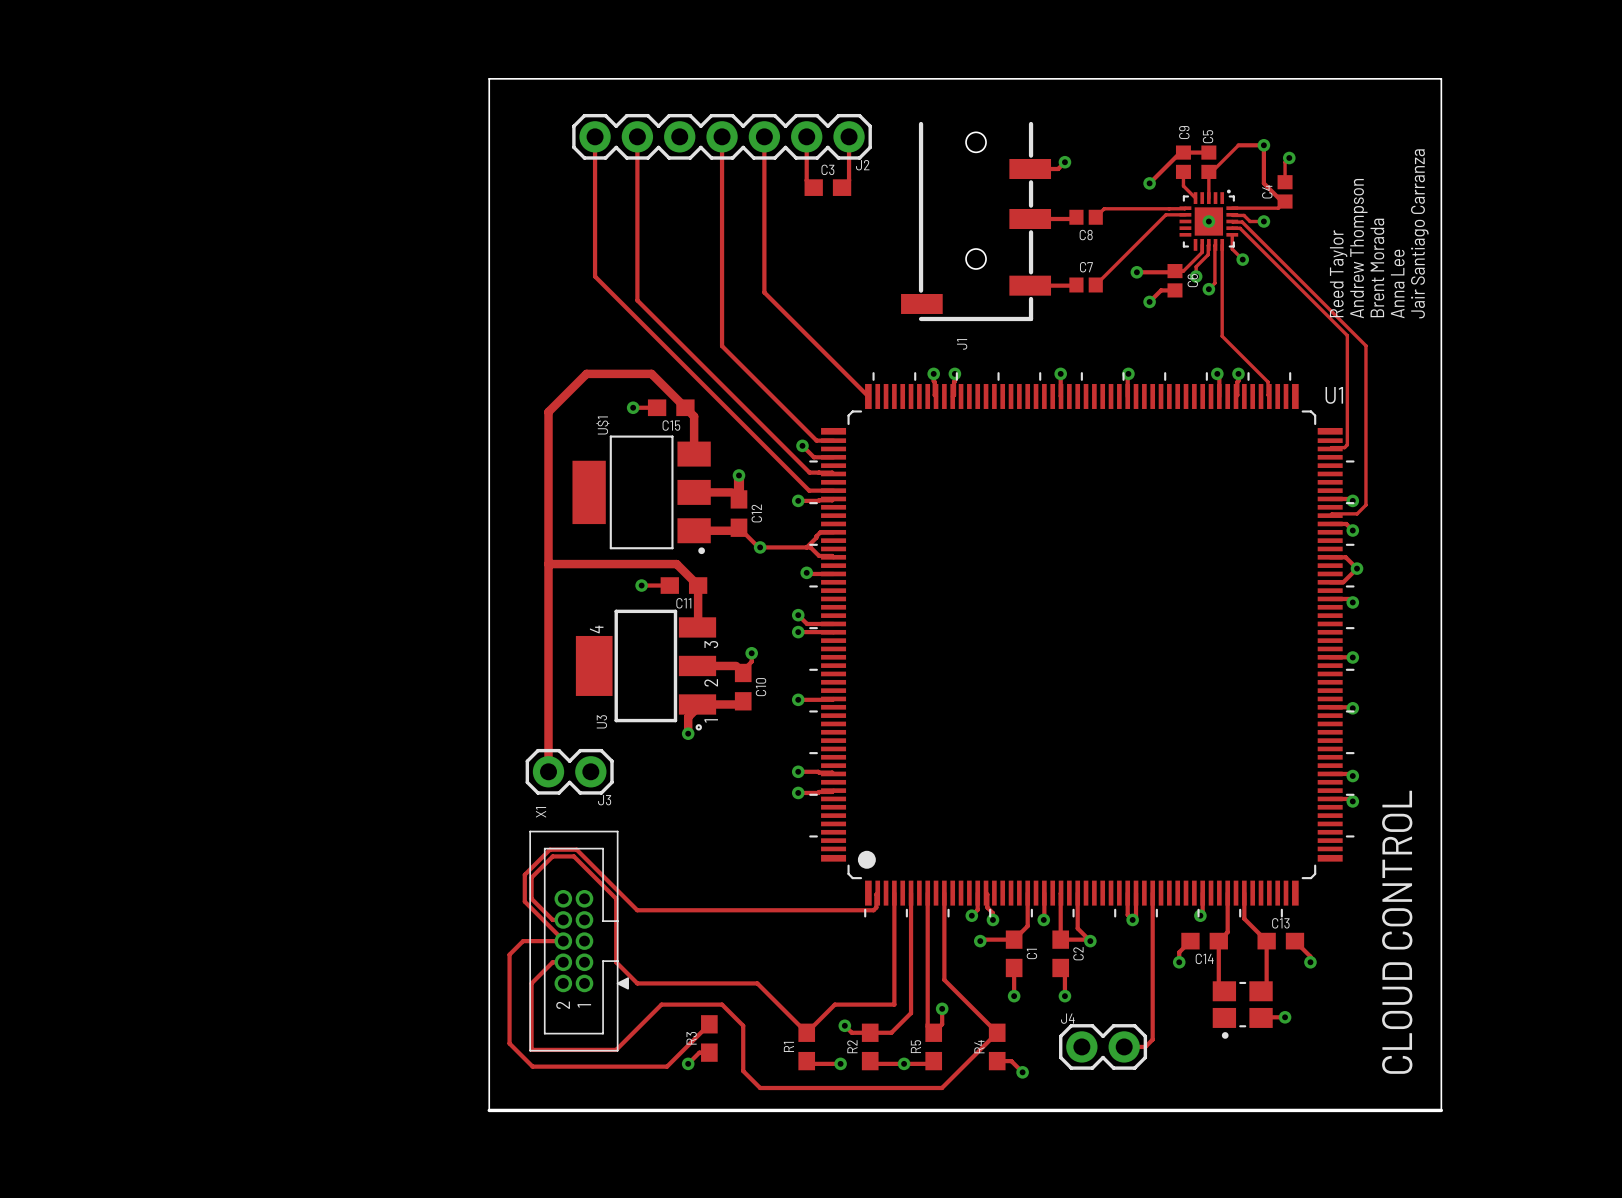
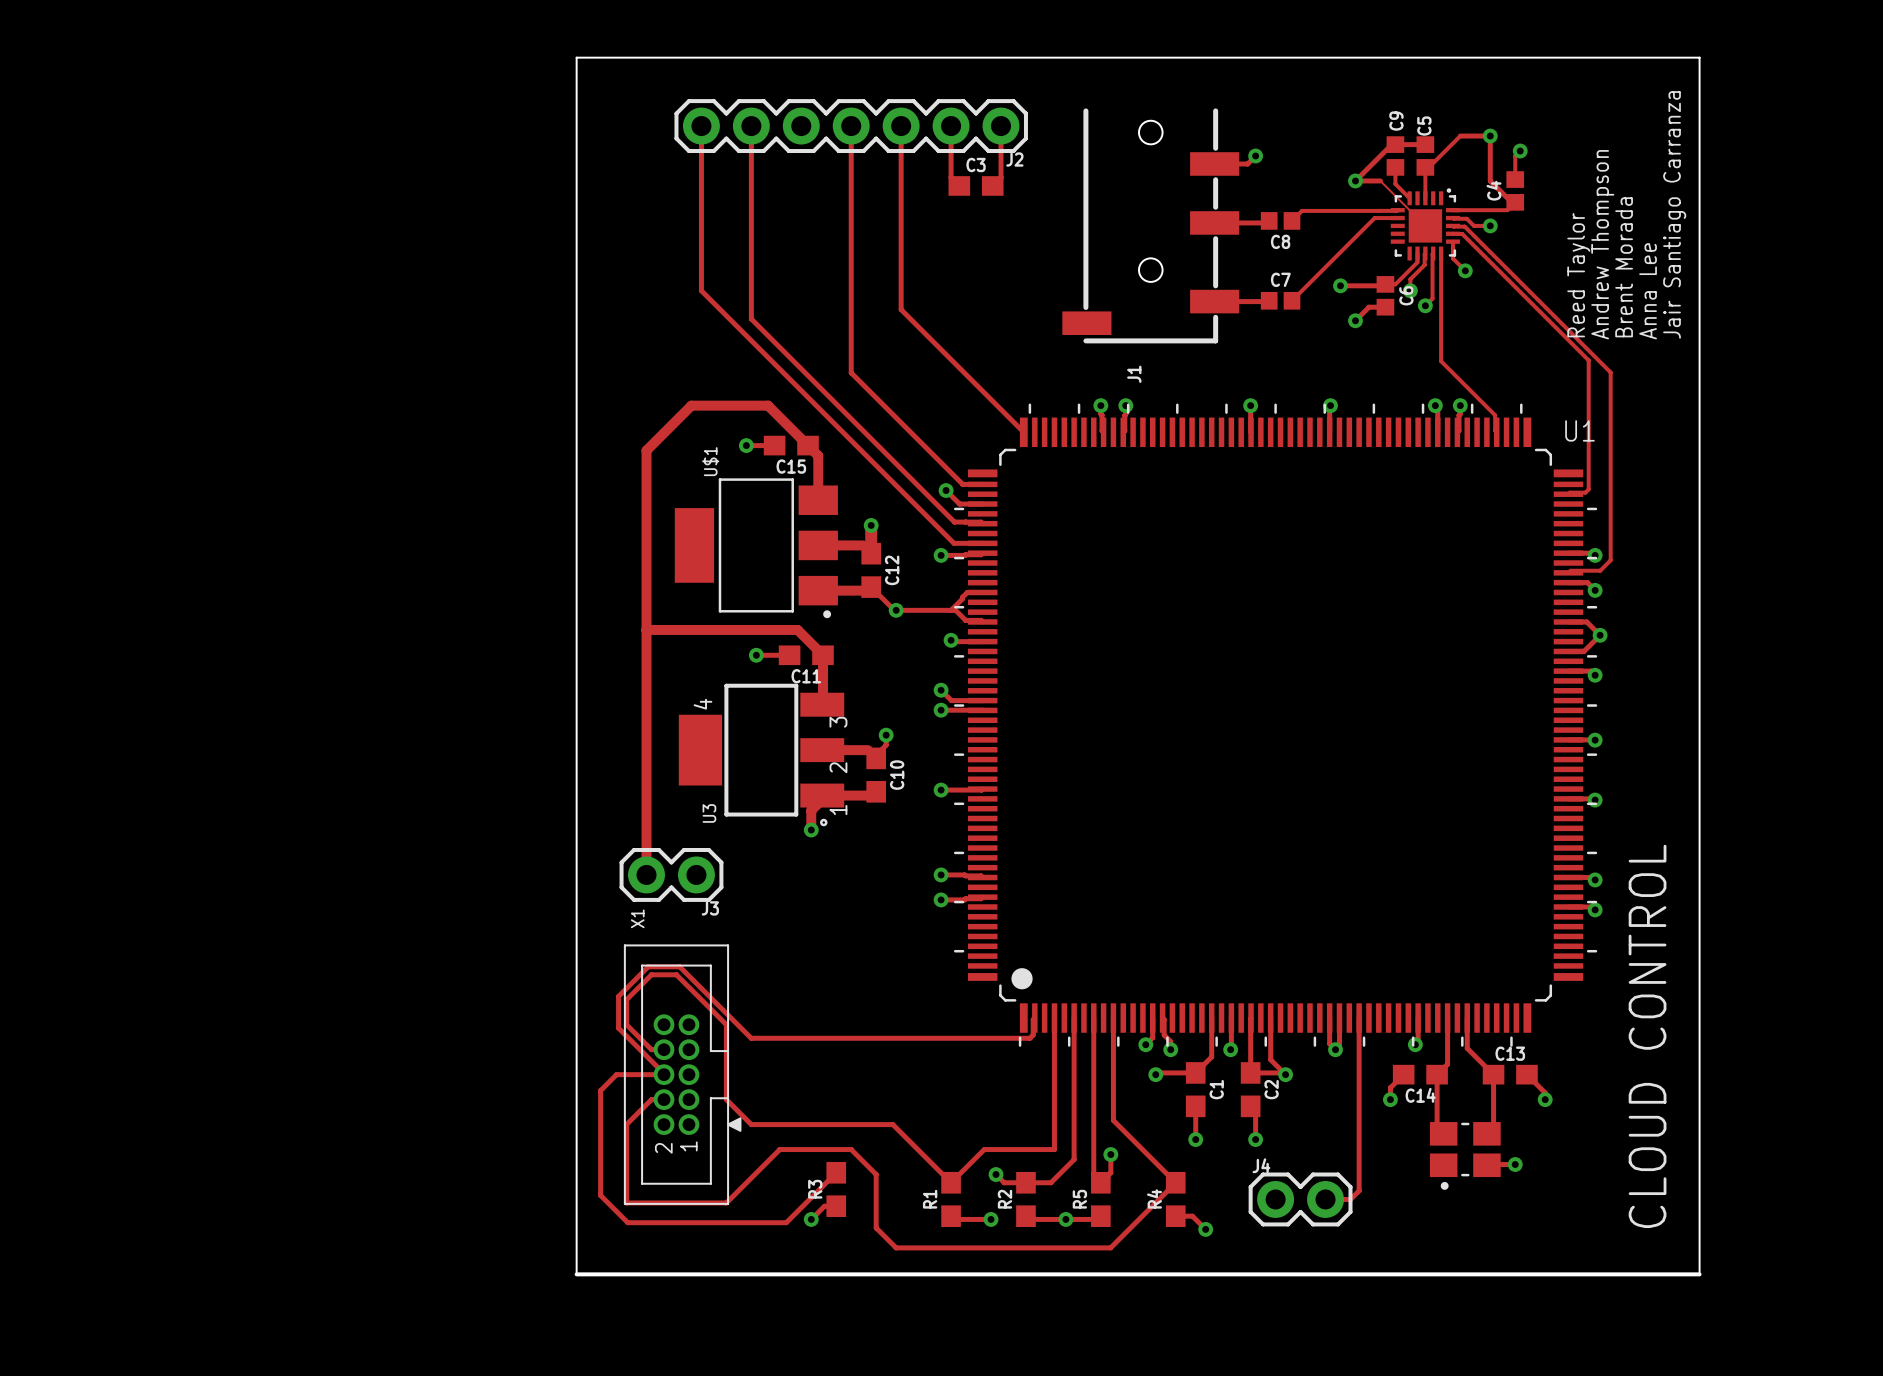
track: none -> (1355, 180) (1380, 180) (1425, 225)
via: (1208, 221) -> none

